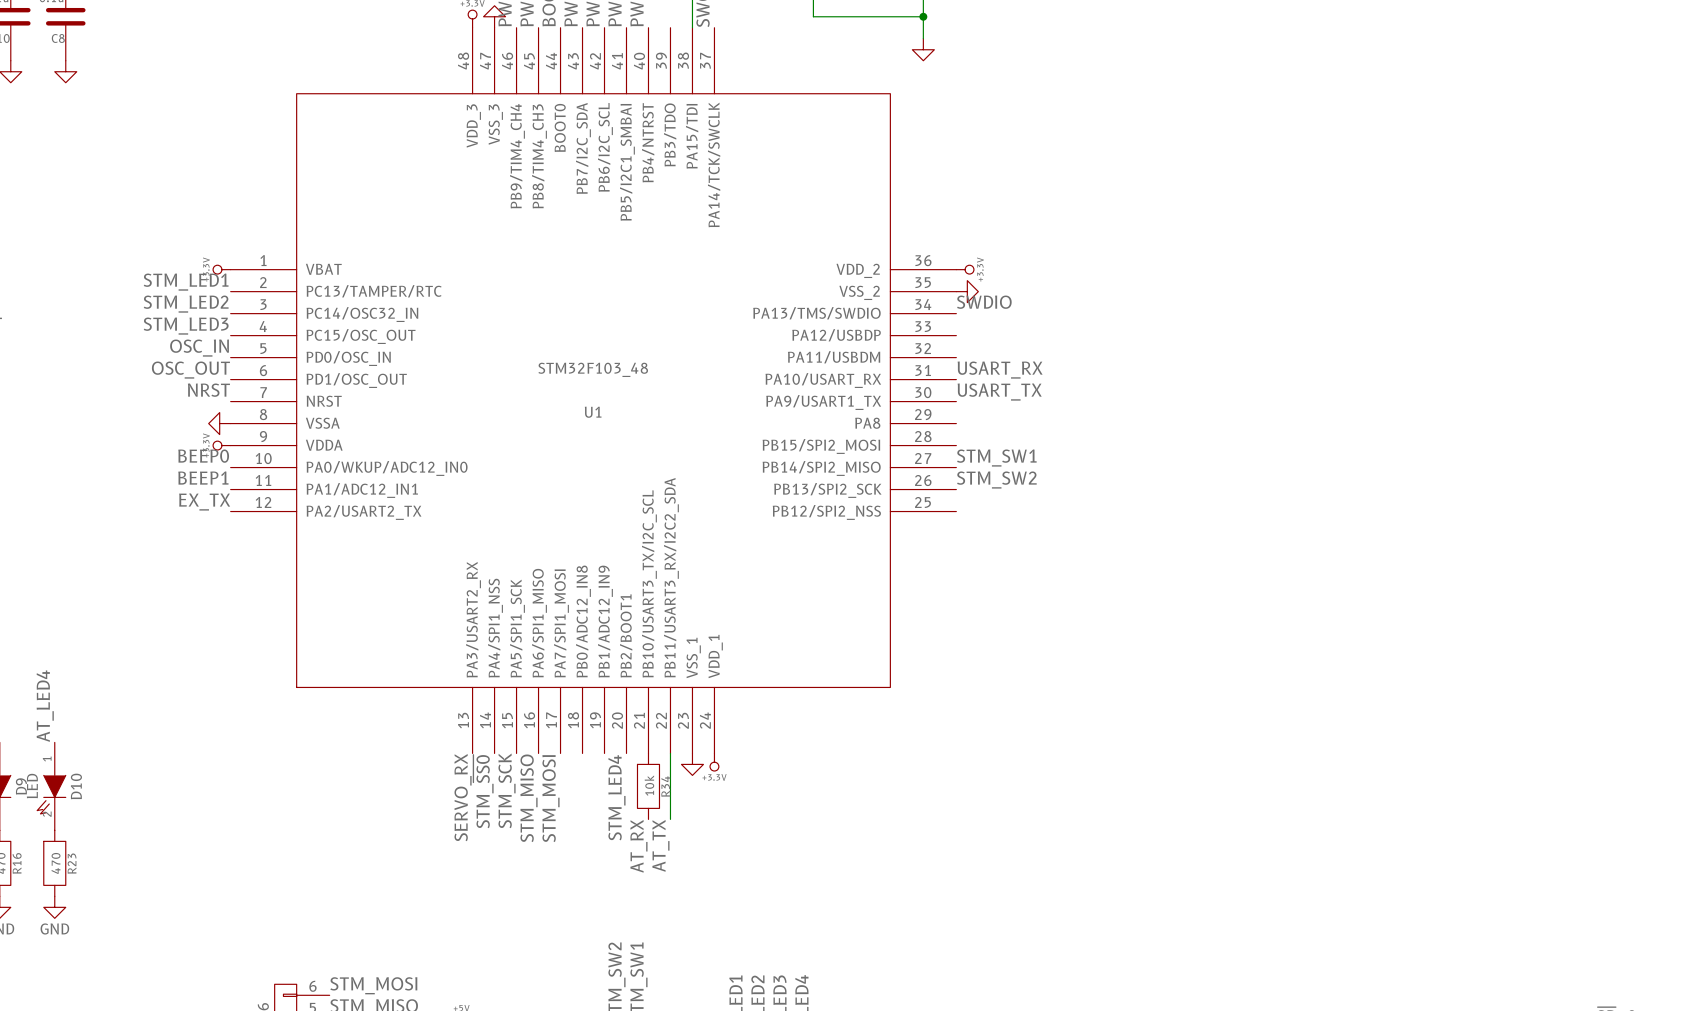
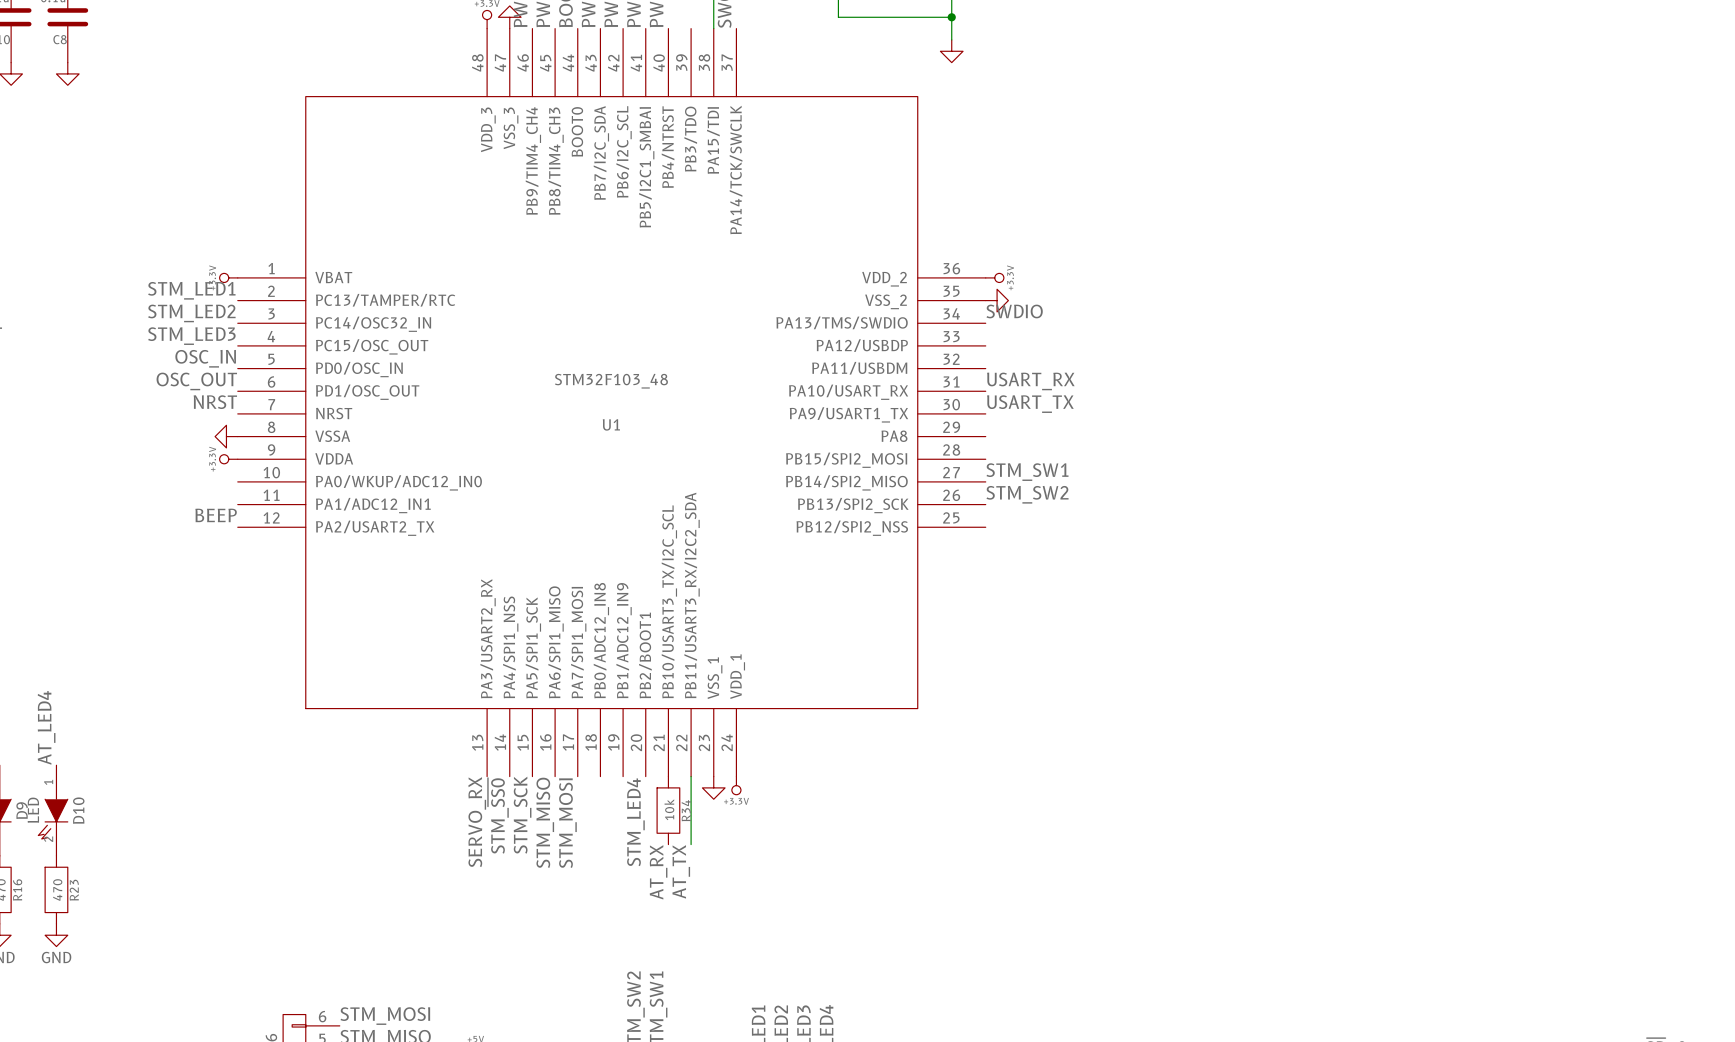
label: BEEP0 (203, 456) -> none
label: BEEP1 (203, 478) -> none
label: EX_TX (204, 501) -> BEEP (216, 515)

